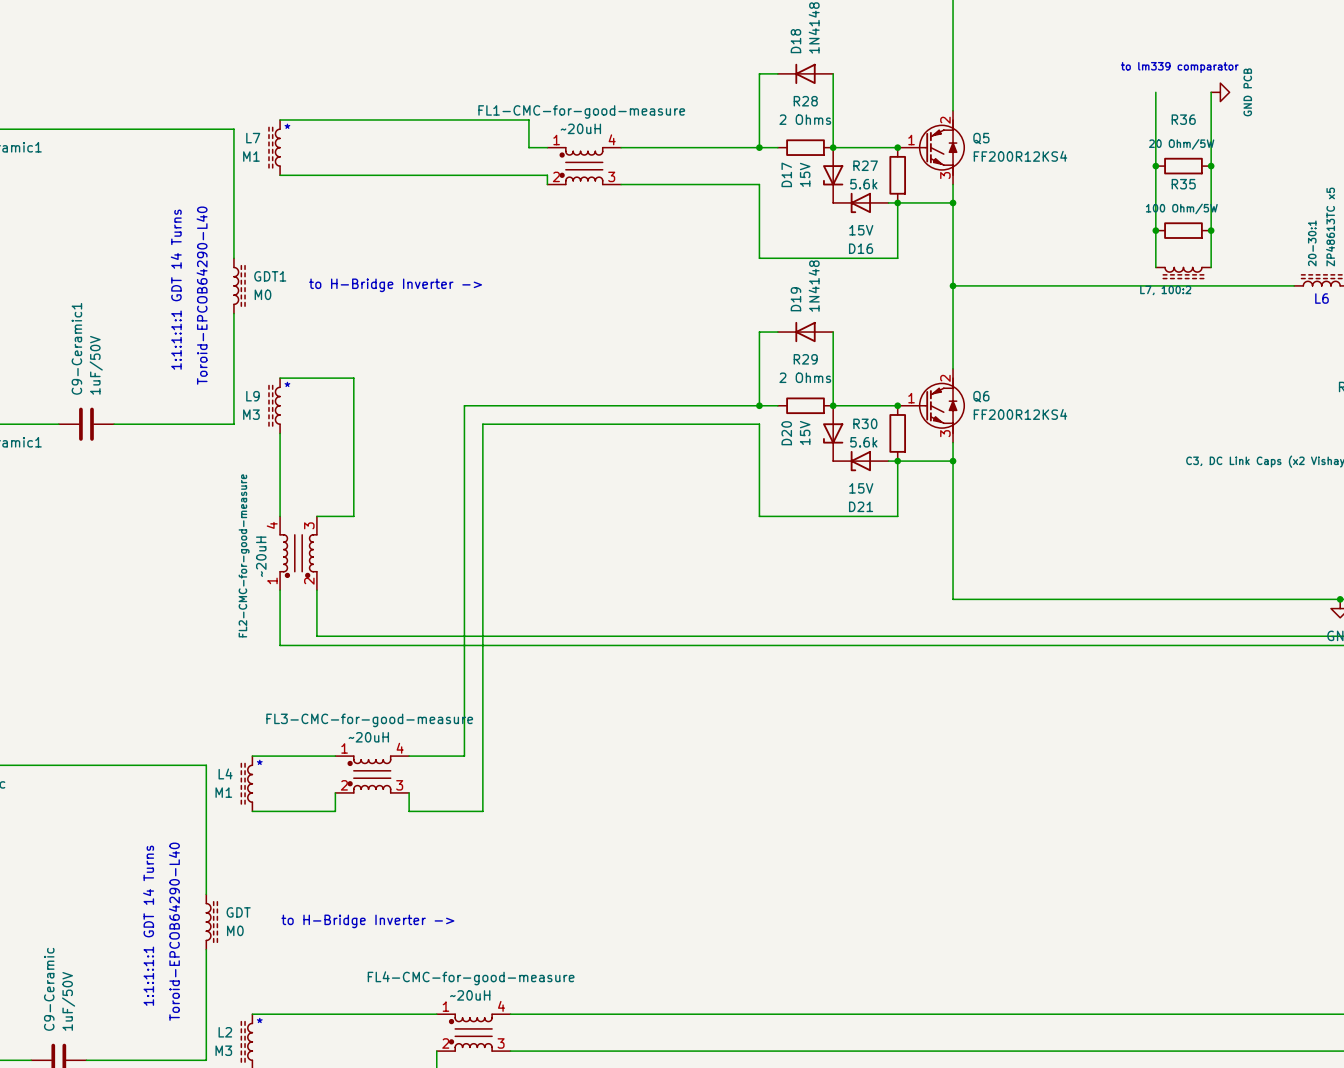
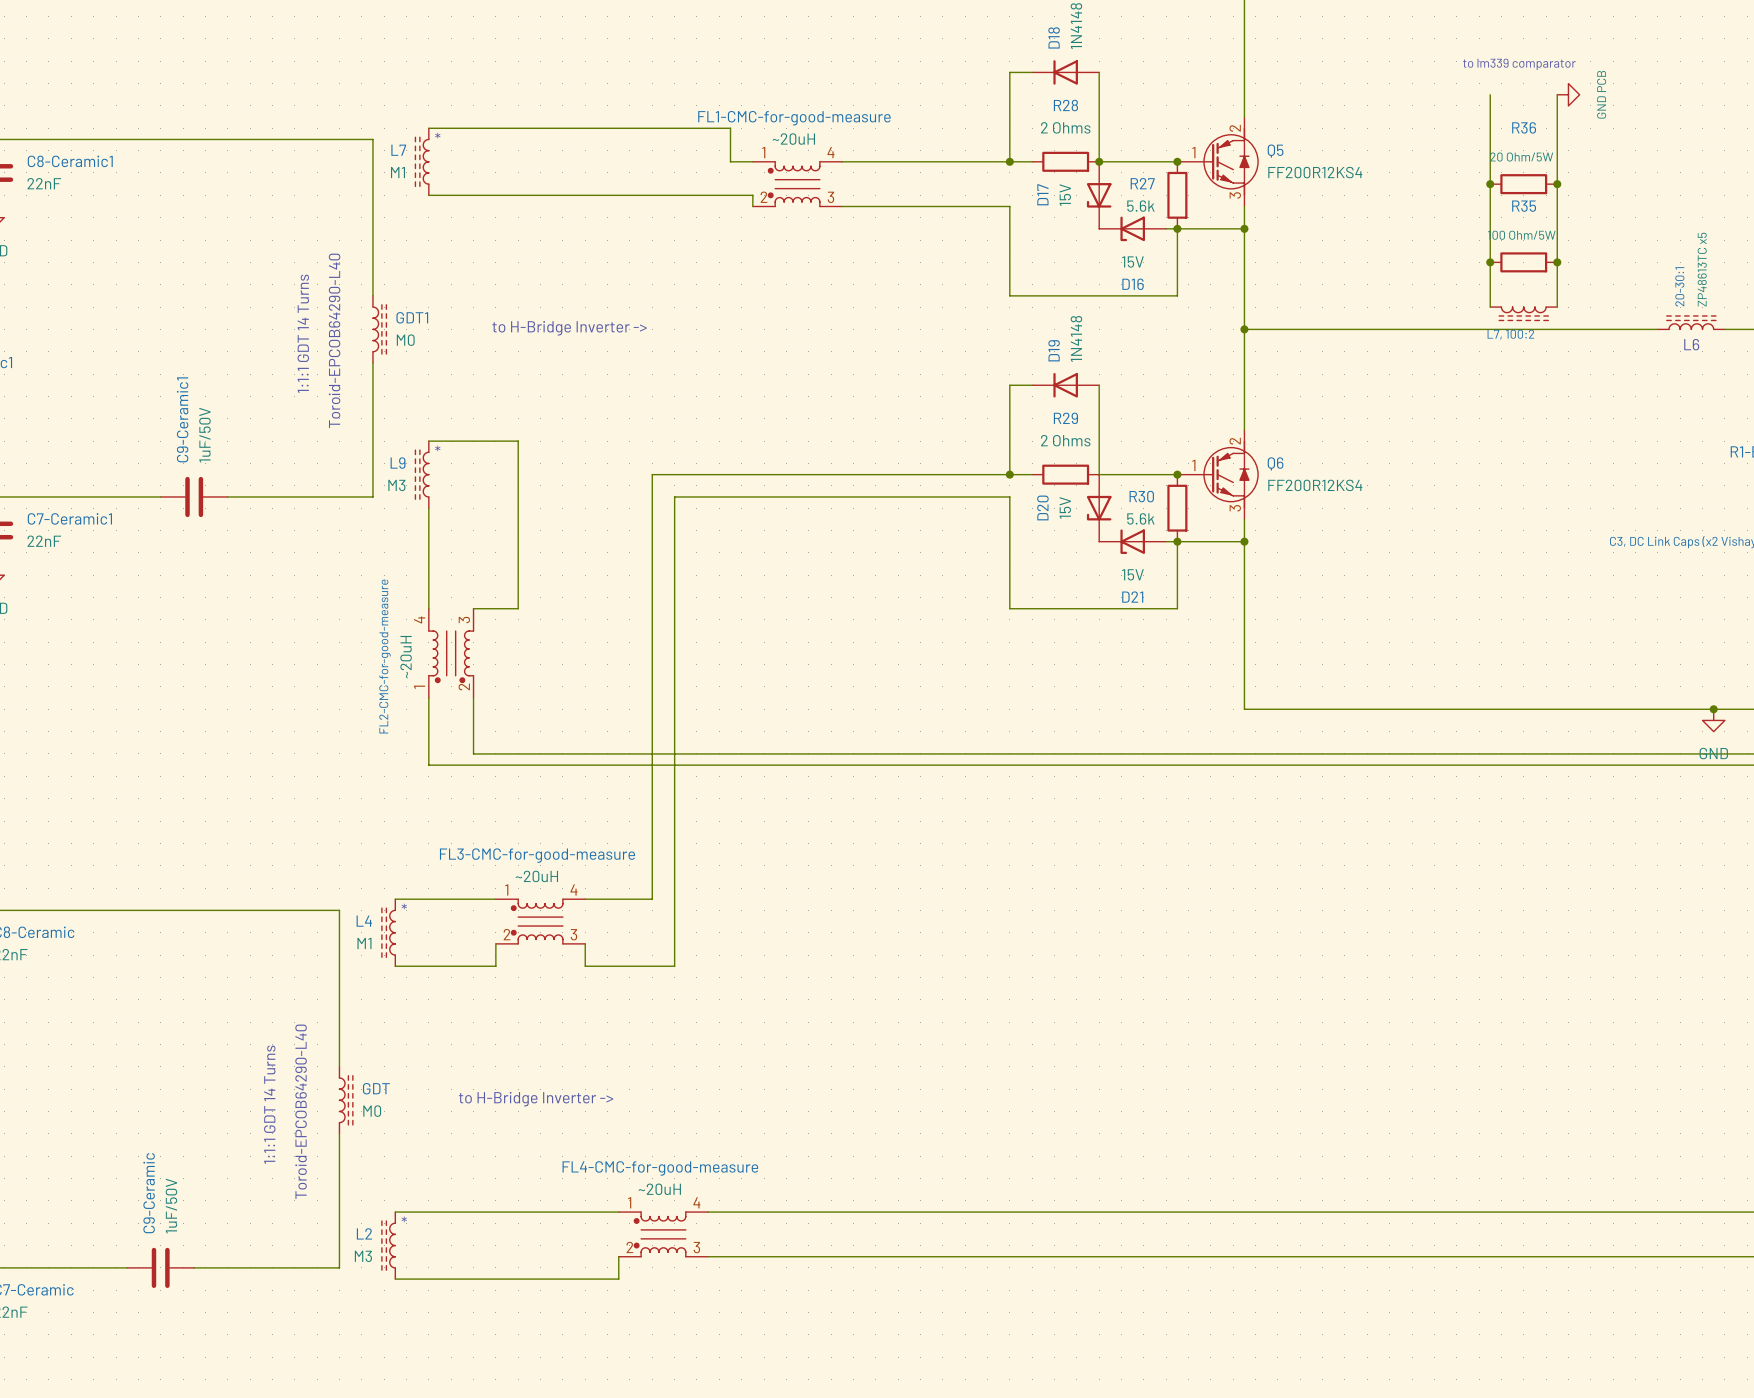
text: 1:1:1:1:1 GDT 14 Turns (176, 289) -> 1:1:1 GDT 14 Turns (303, 333)
junction: (833, 405) -> none
text: 1:1:1:1:1 GDT 14 Turns (148, 925) -> 1:1:1 GDT 14 Turns (269, 1104)

